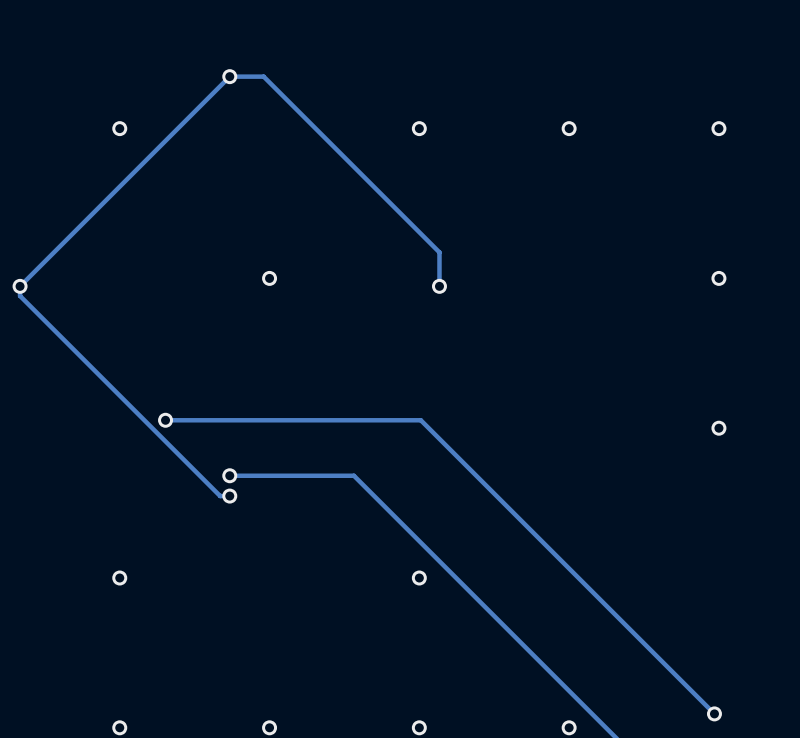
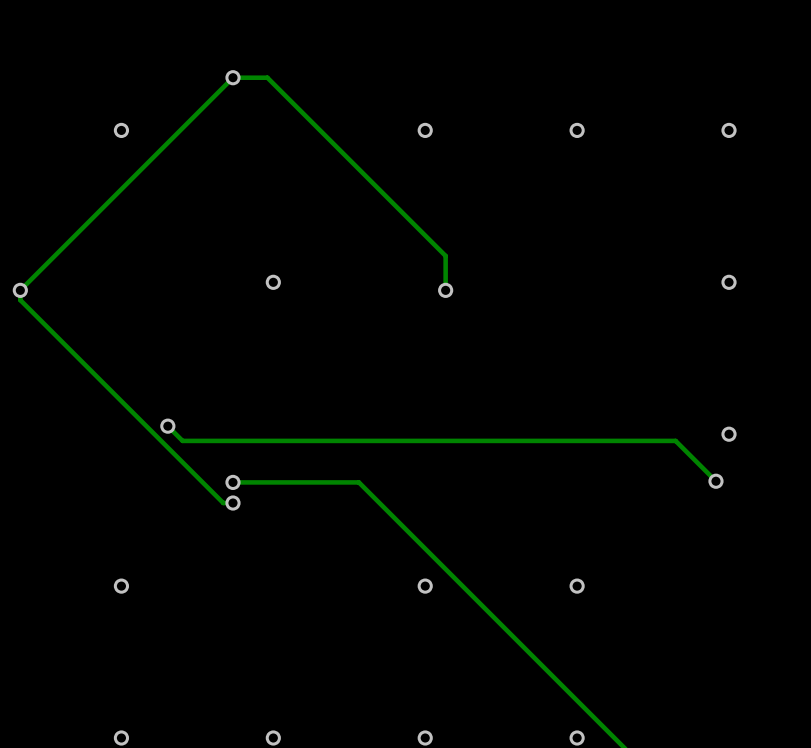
track: (165, 420) (420, 420) (714, 713) -> (167, 426) (182, 440) (675, 440) (715, 481)
via: none -> (715, 481)
via: none -> (577, 586)
via: (714, 713) -> none

